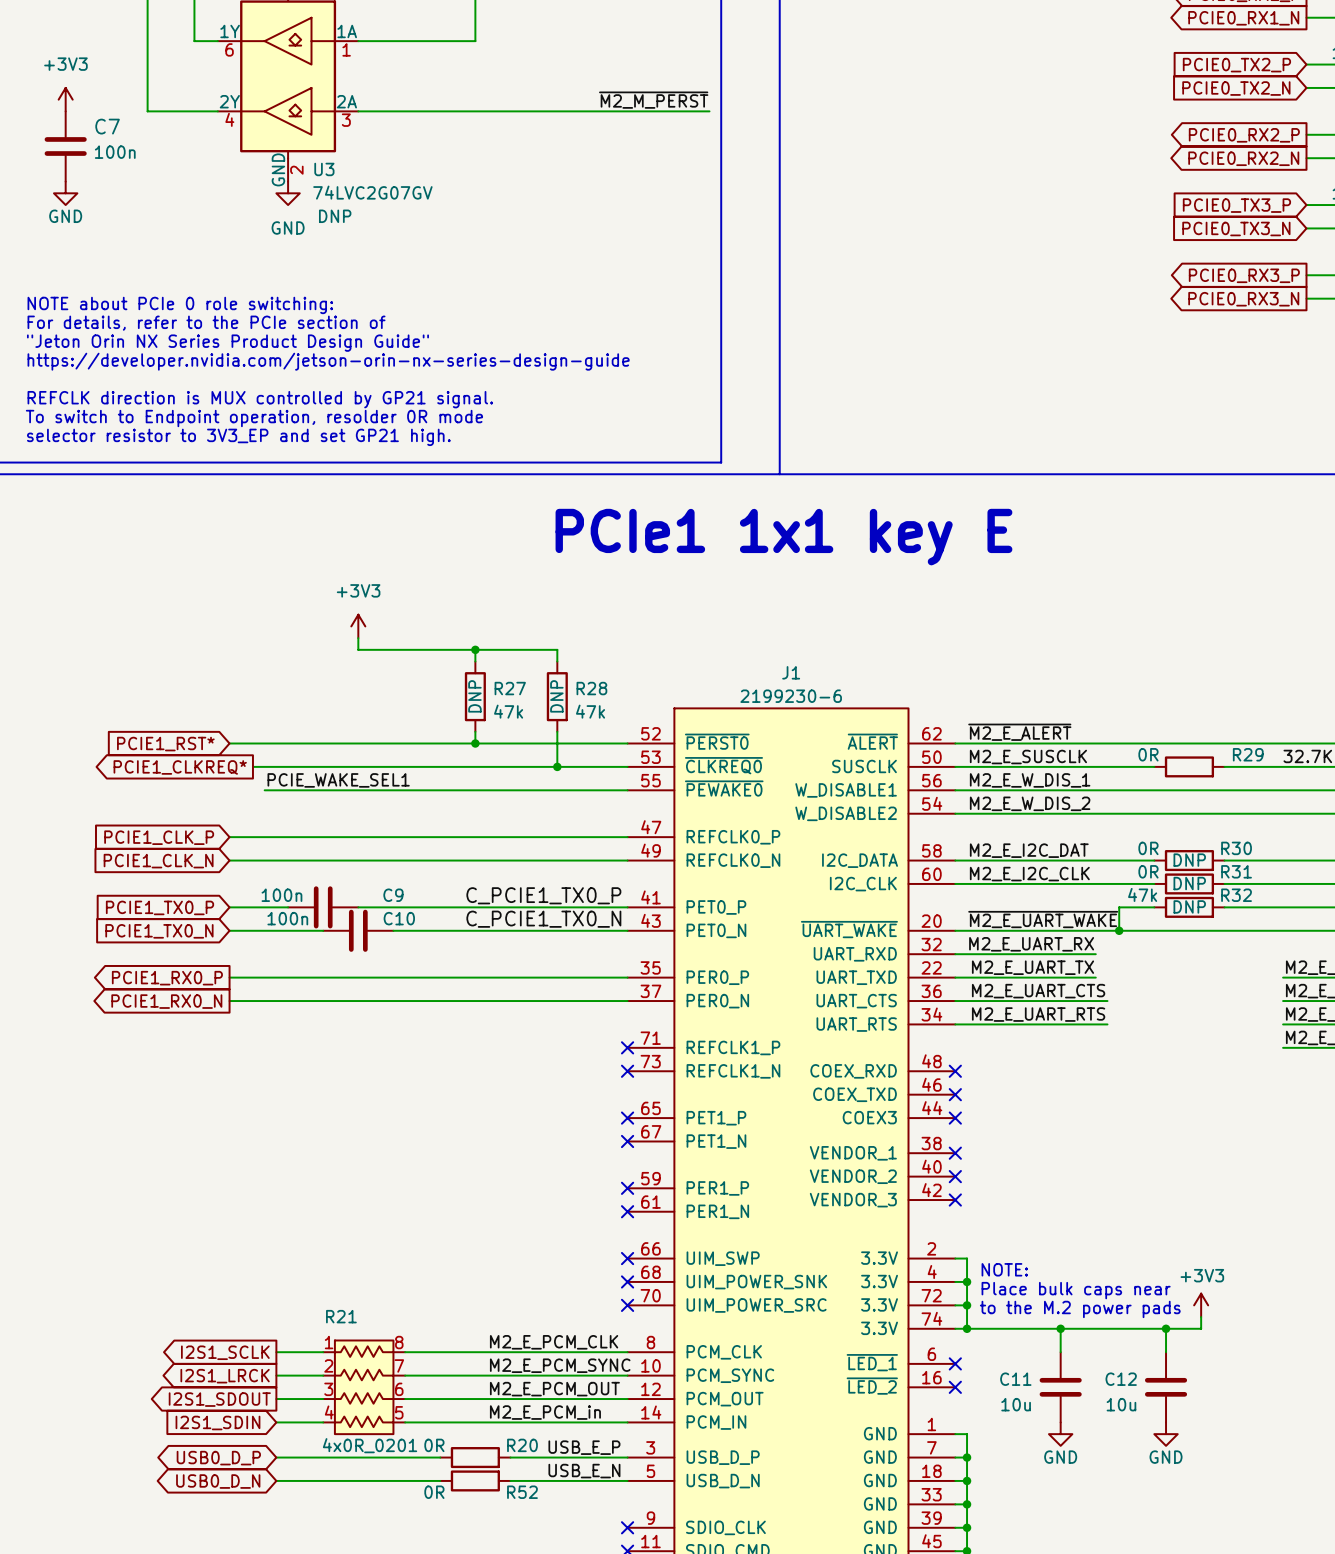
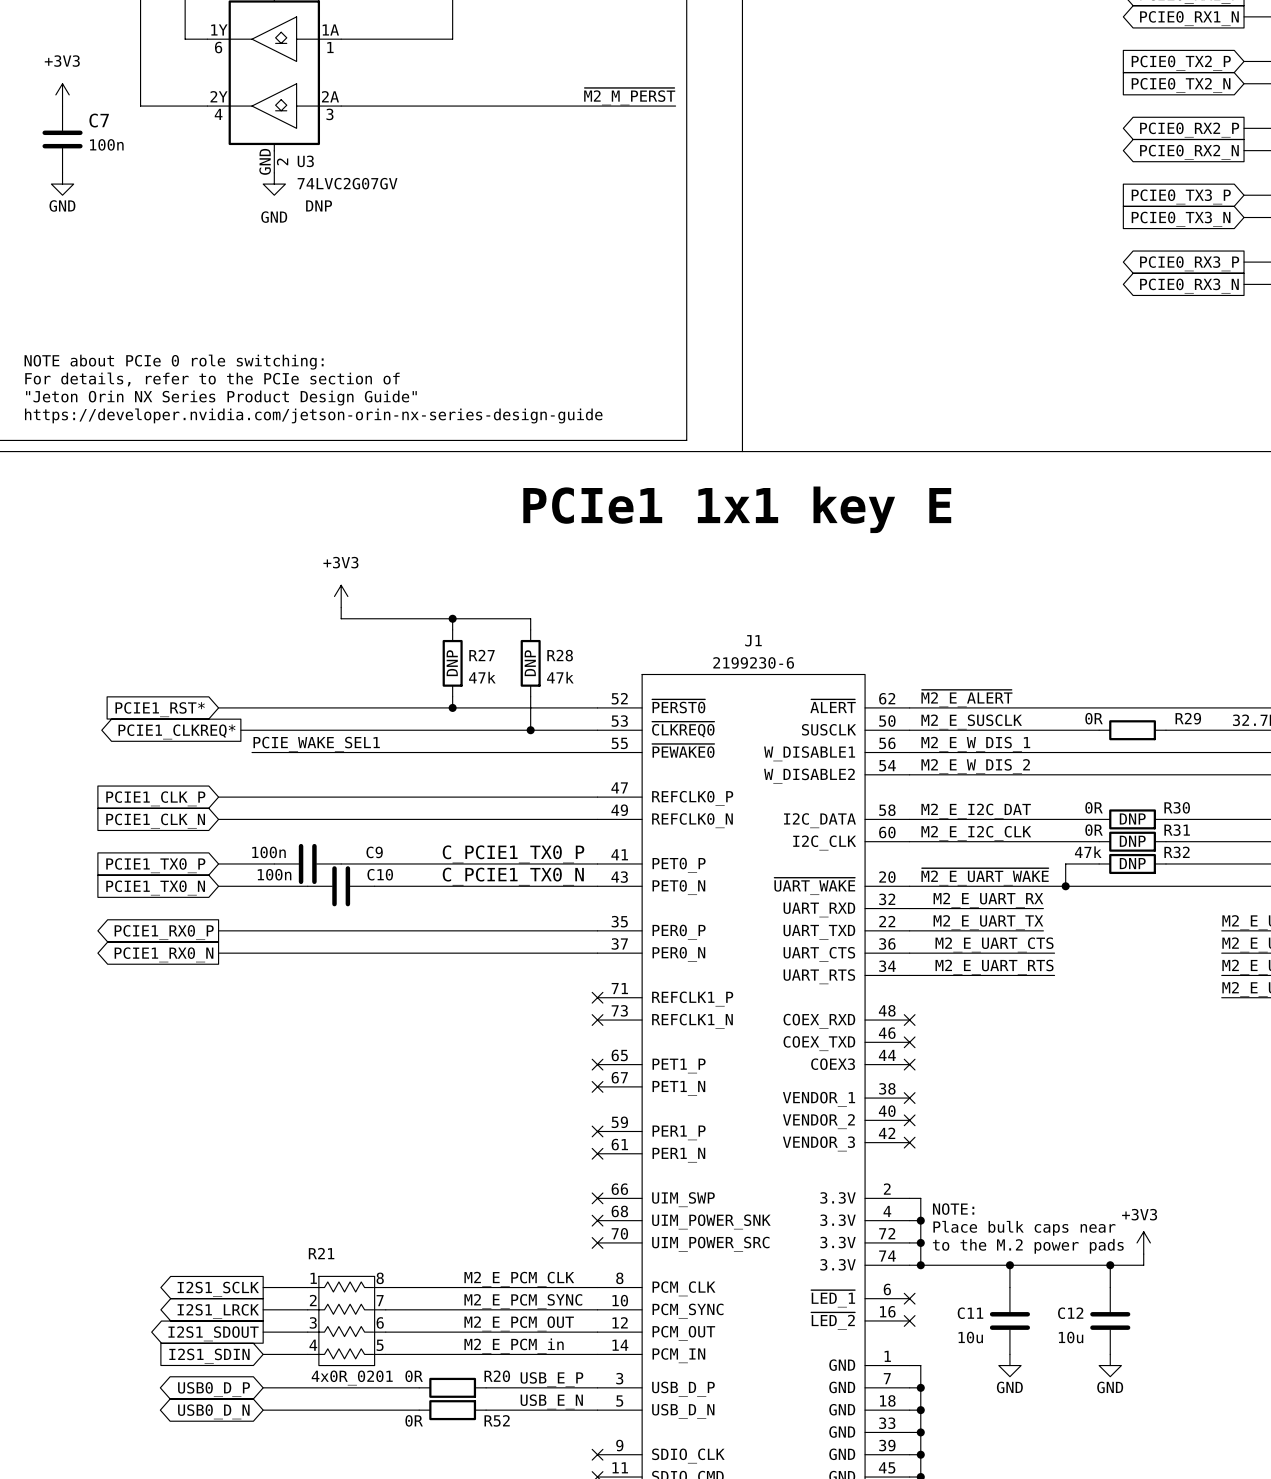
text position: NOTE about PCIe 0 role switching: (180, 305) -> NOTE about PCIe 0 role switching: (174, 362)
text: For details, refer to the PCIe section of (206, 323) -> none
text: "Jeton Orin NX Series Product Design Guide" (227, 343) -> none
text: https://developer.nvidia.com/jetson-orin-nx-series-design-guide (328, 361) -> none
text: REFCLK direction is MUX controlled by GP21 signal. (260, 399) -> For details, refer to the PCIe section of (212, 379)
text: To switch to Endpoint operation, resolder 0R mode (254, 418) -> "Jeton Orin NX Series Product Design Guide" (221, 398)
text: selector resistor to 3V3_EP and set GP21 high. (238, 437) -> https://developer.nvidia.com/jetson-orin-nx-series-design-guide (313, 415)

